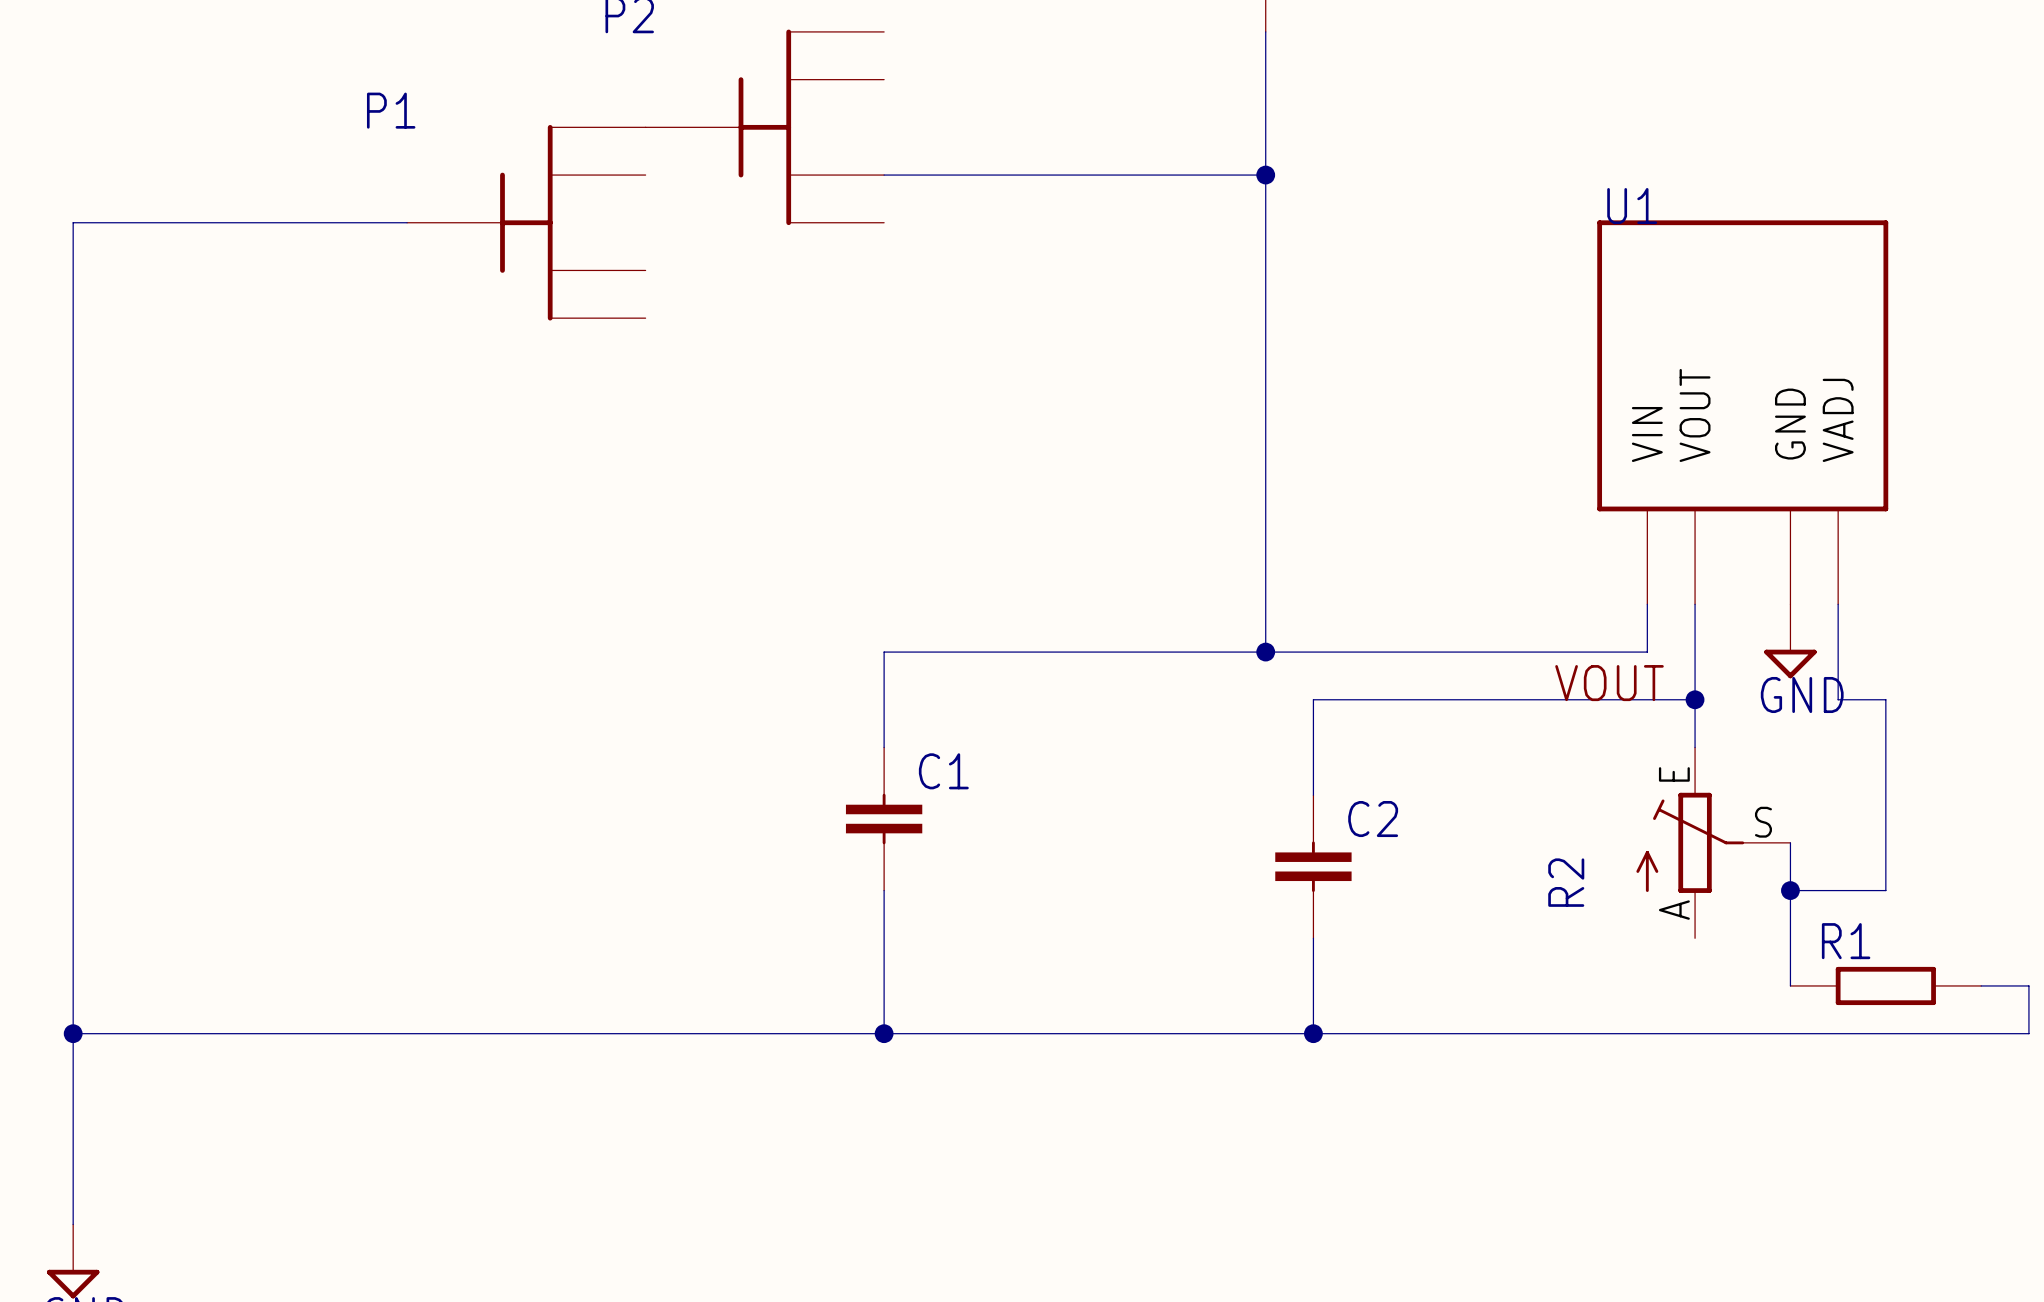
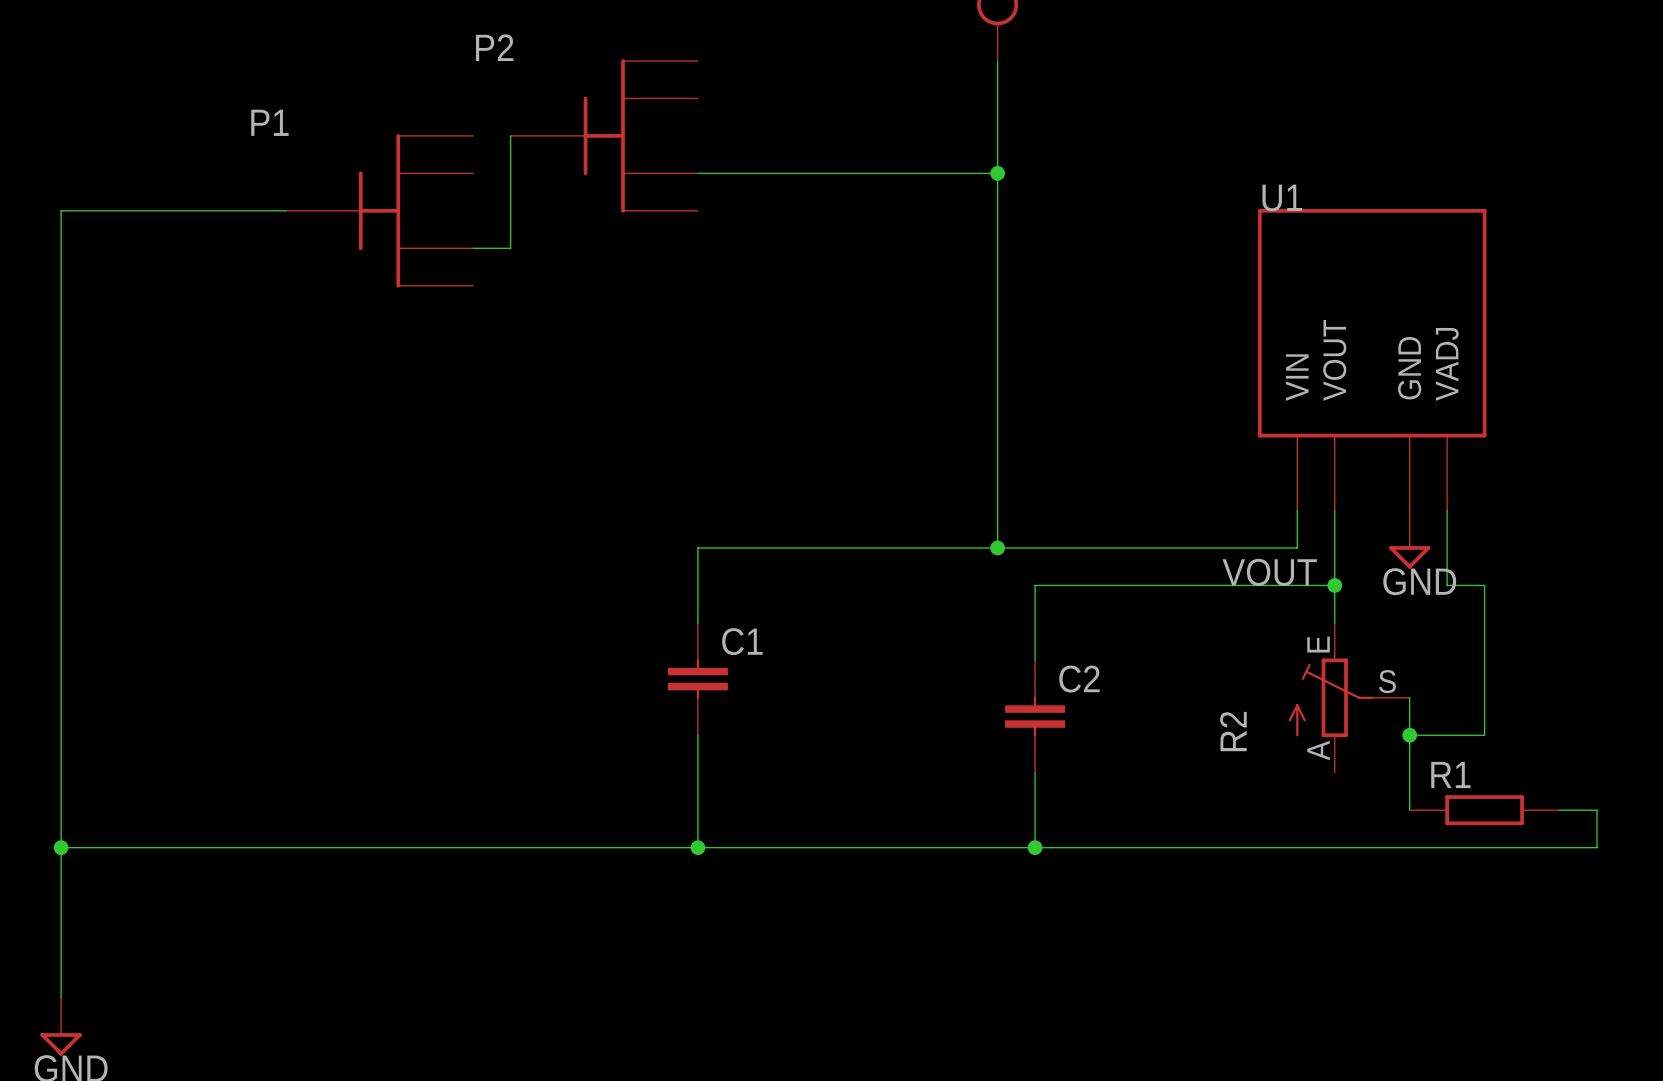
wire: none -> (510, 135) (510, 248) (473, 248)
P1 position: (526, 222) -> (379, 210)

